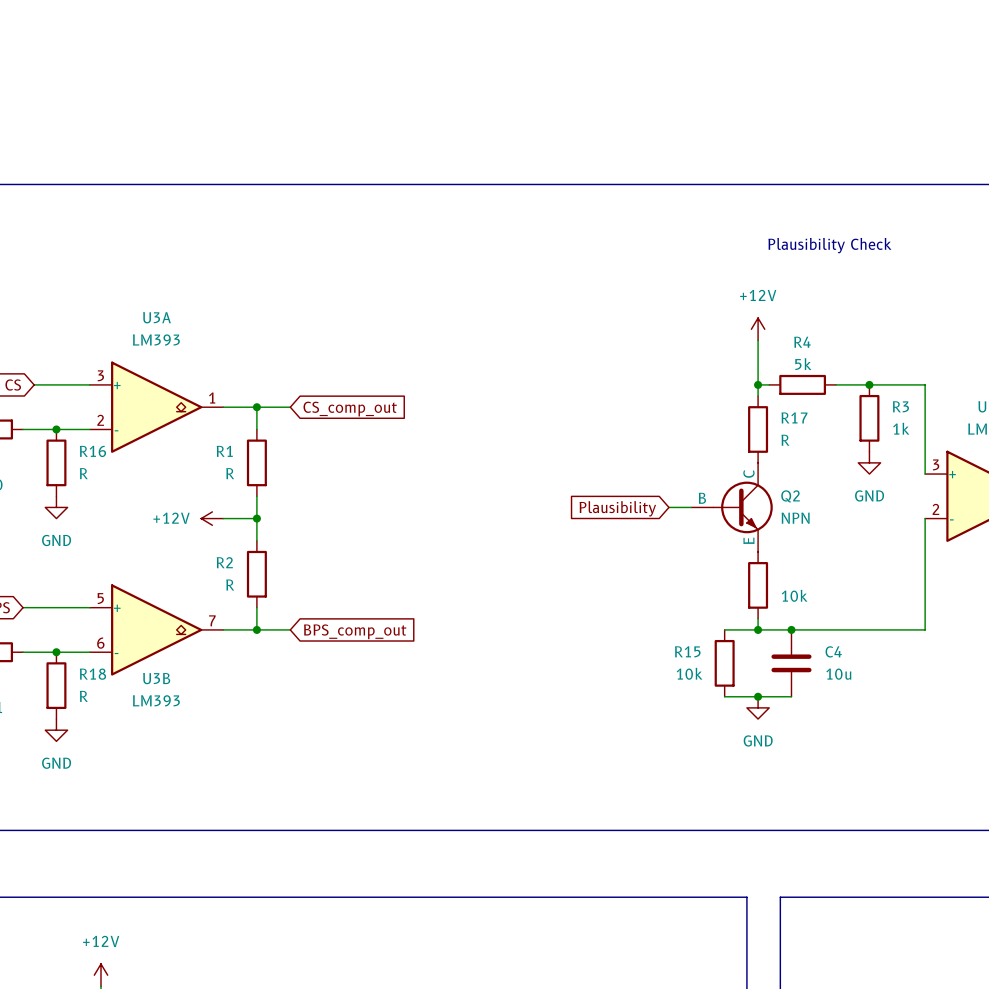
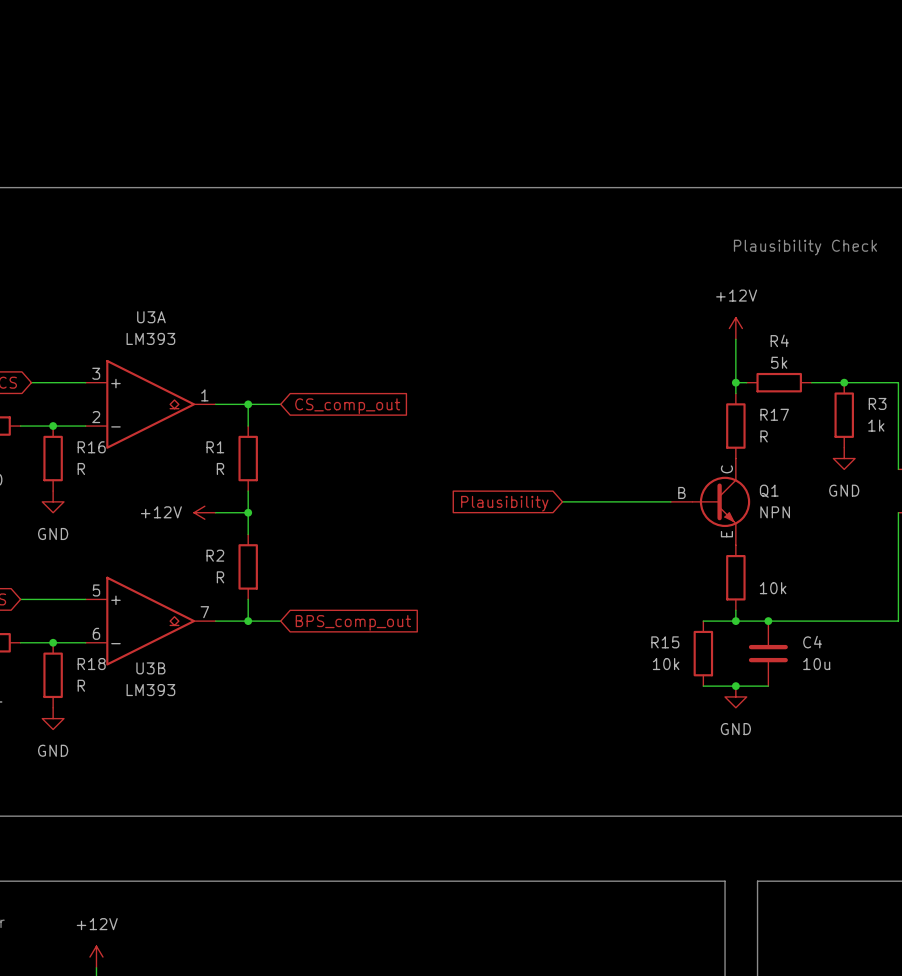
Q2 name: Q2 (790, 496) -> Q1 (769, 491)
wire: none -> (562, 501) (649, 501)
global label position: Plausibility (617, 508) -> Plausibility (504, 503)

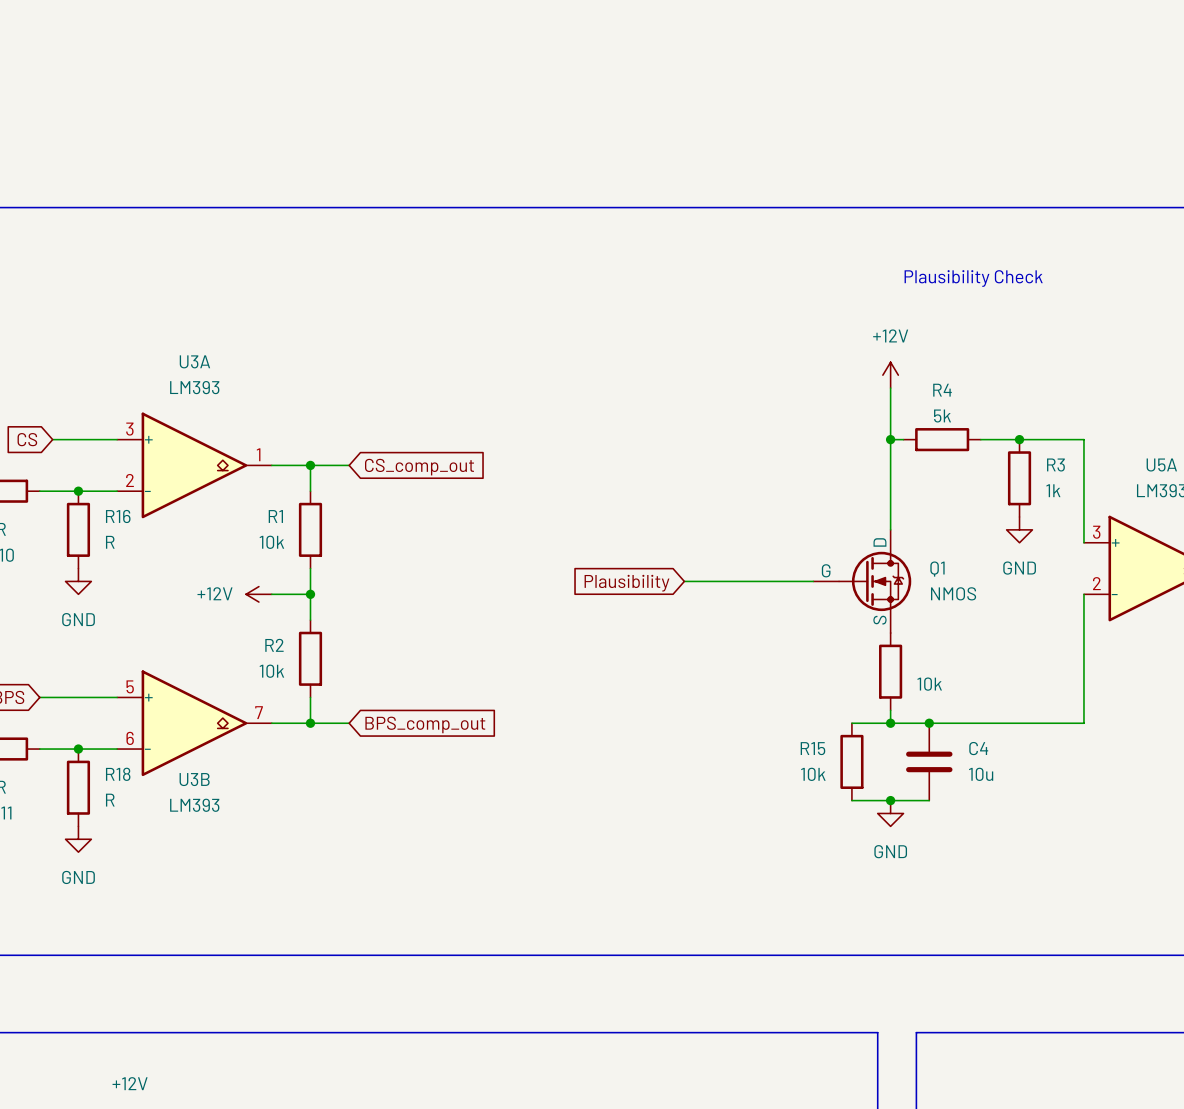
wire: none -> (890, 452) (890, 529)
R17: R (735, 426) -> none
Q1 symbol: [670, 458, 751, 546] -> [813, 529, 912, 634]
R1 value: R (220, 468) -> 10k (271, 542)
Q1 value: NPN (775, 512) -> NMOS (953, 593)
R2 value: R (220, 577) -> 10k (271, 671)

